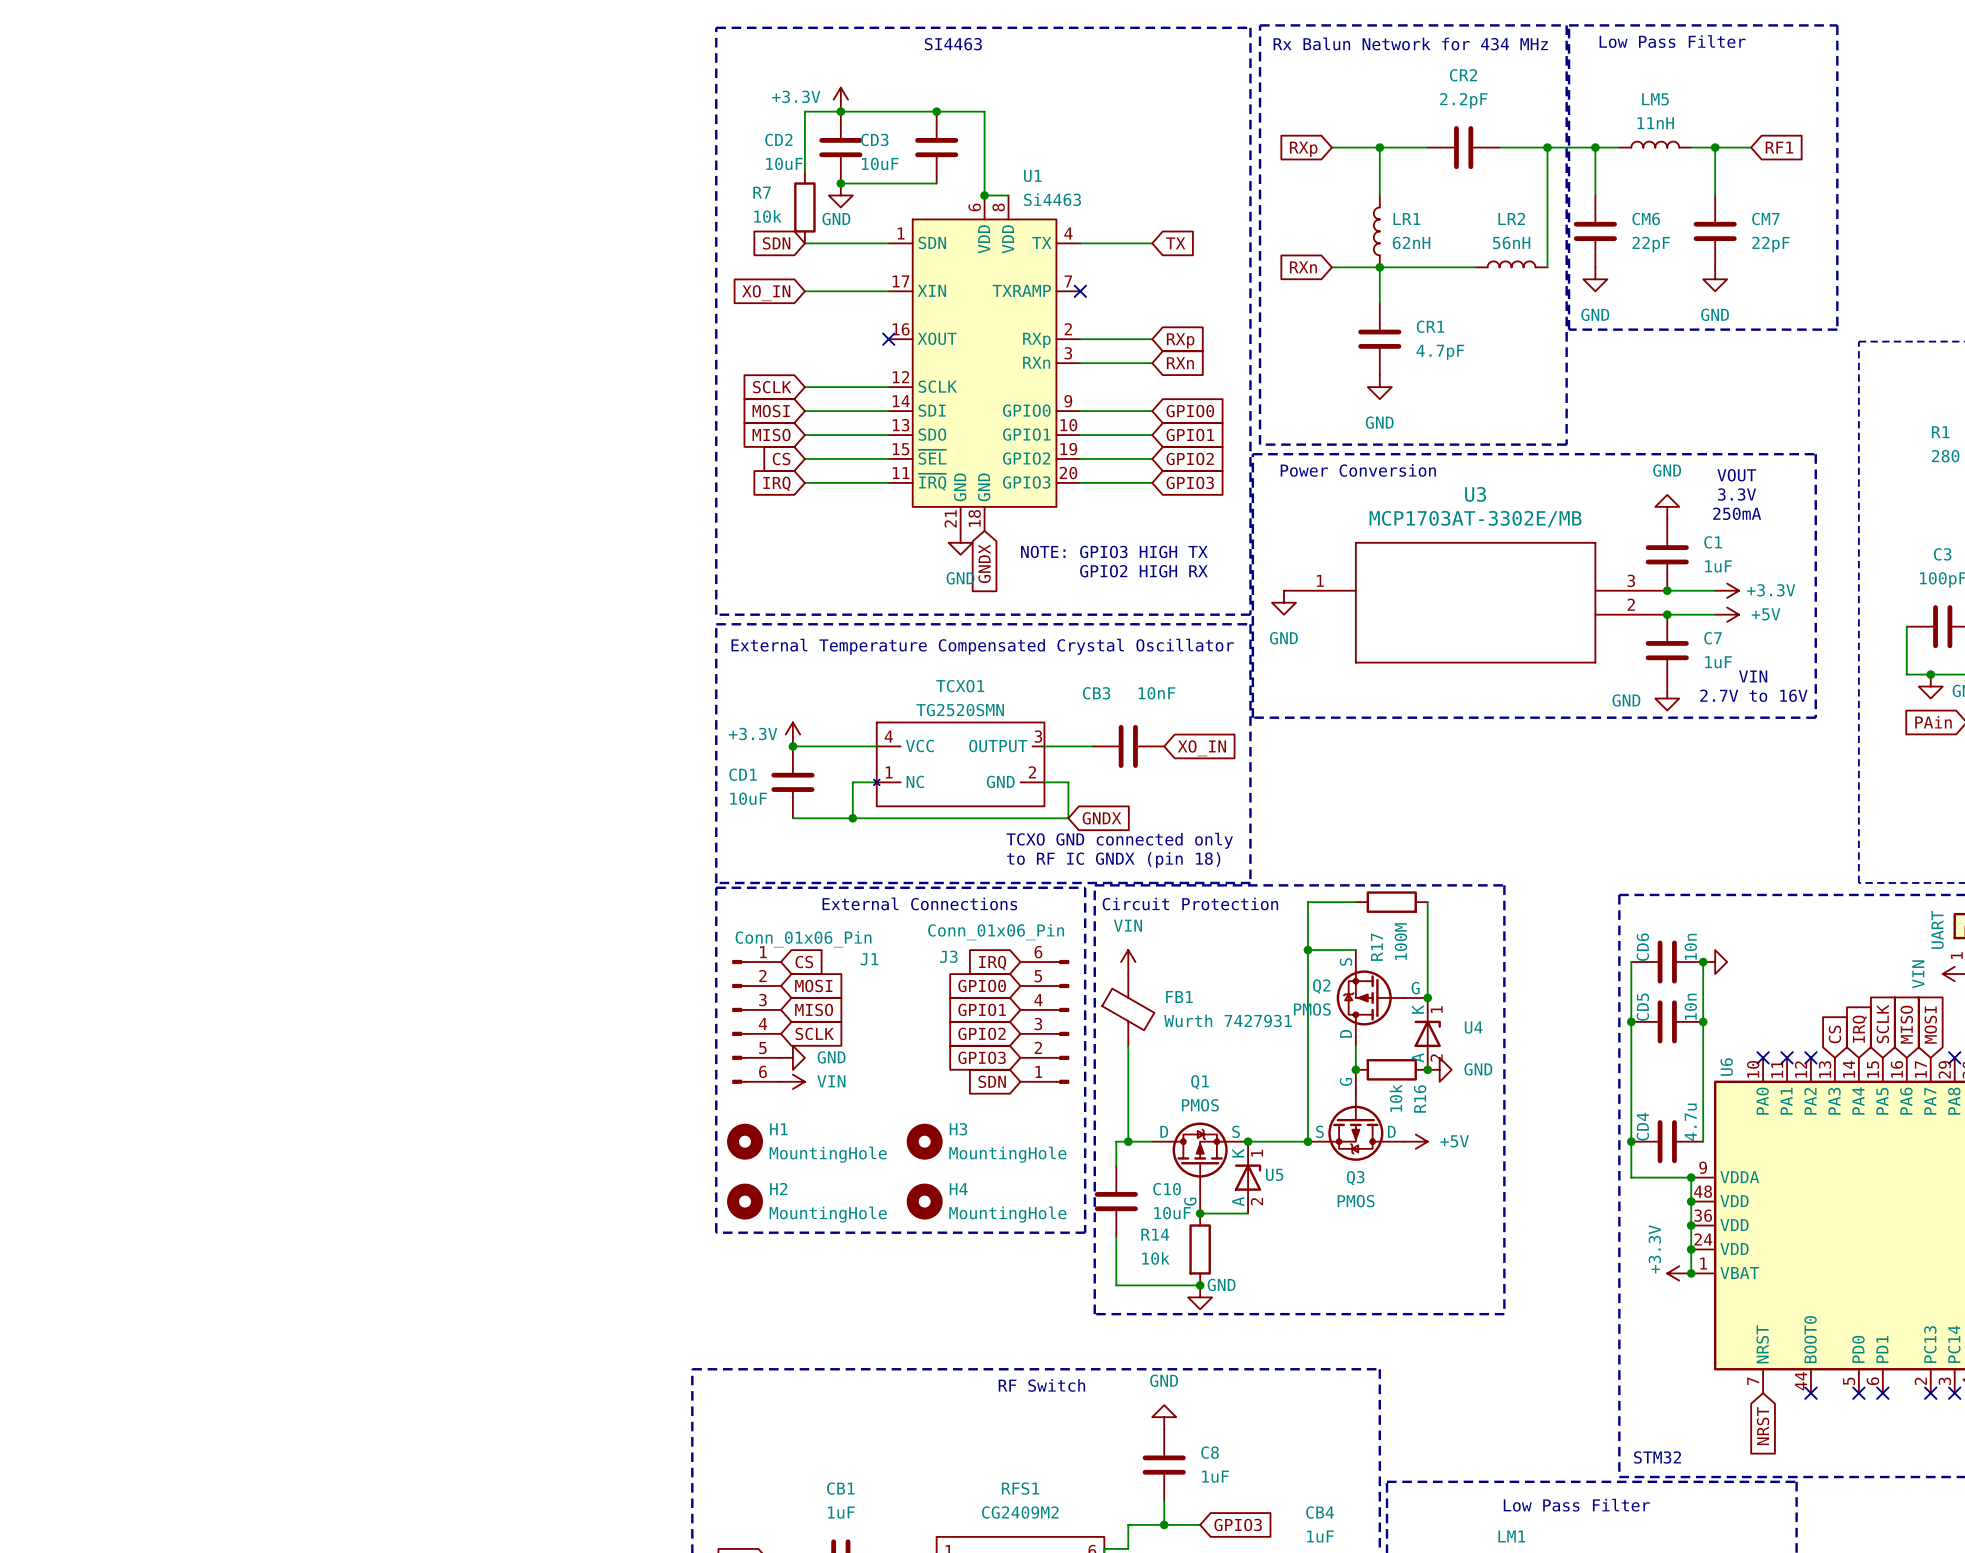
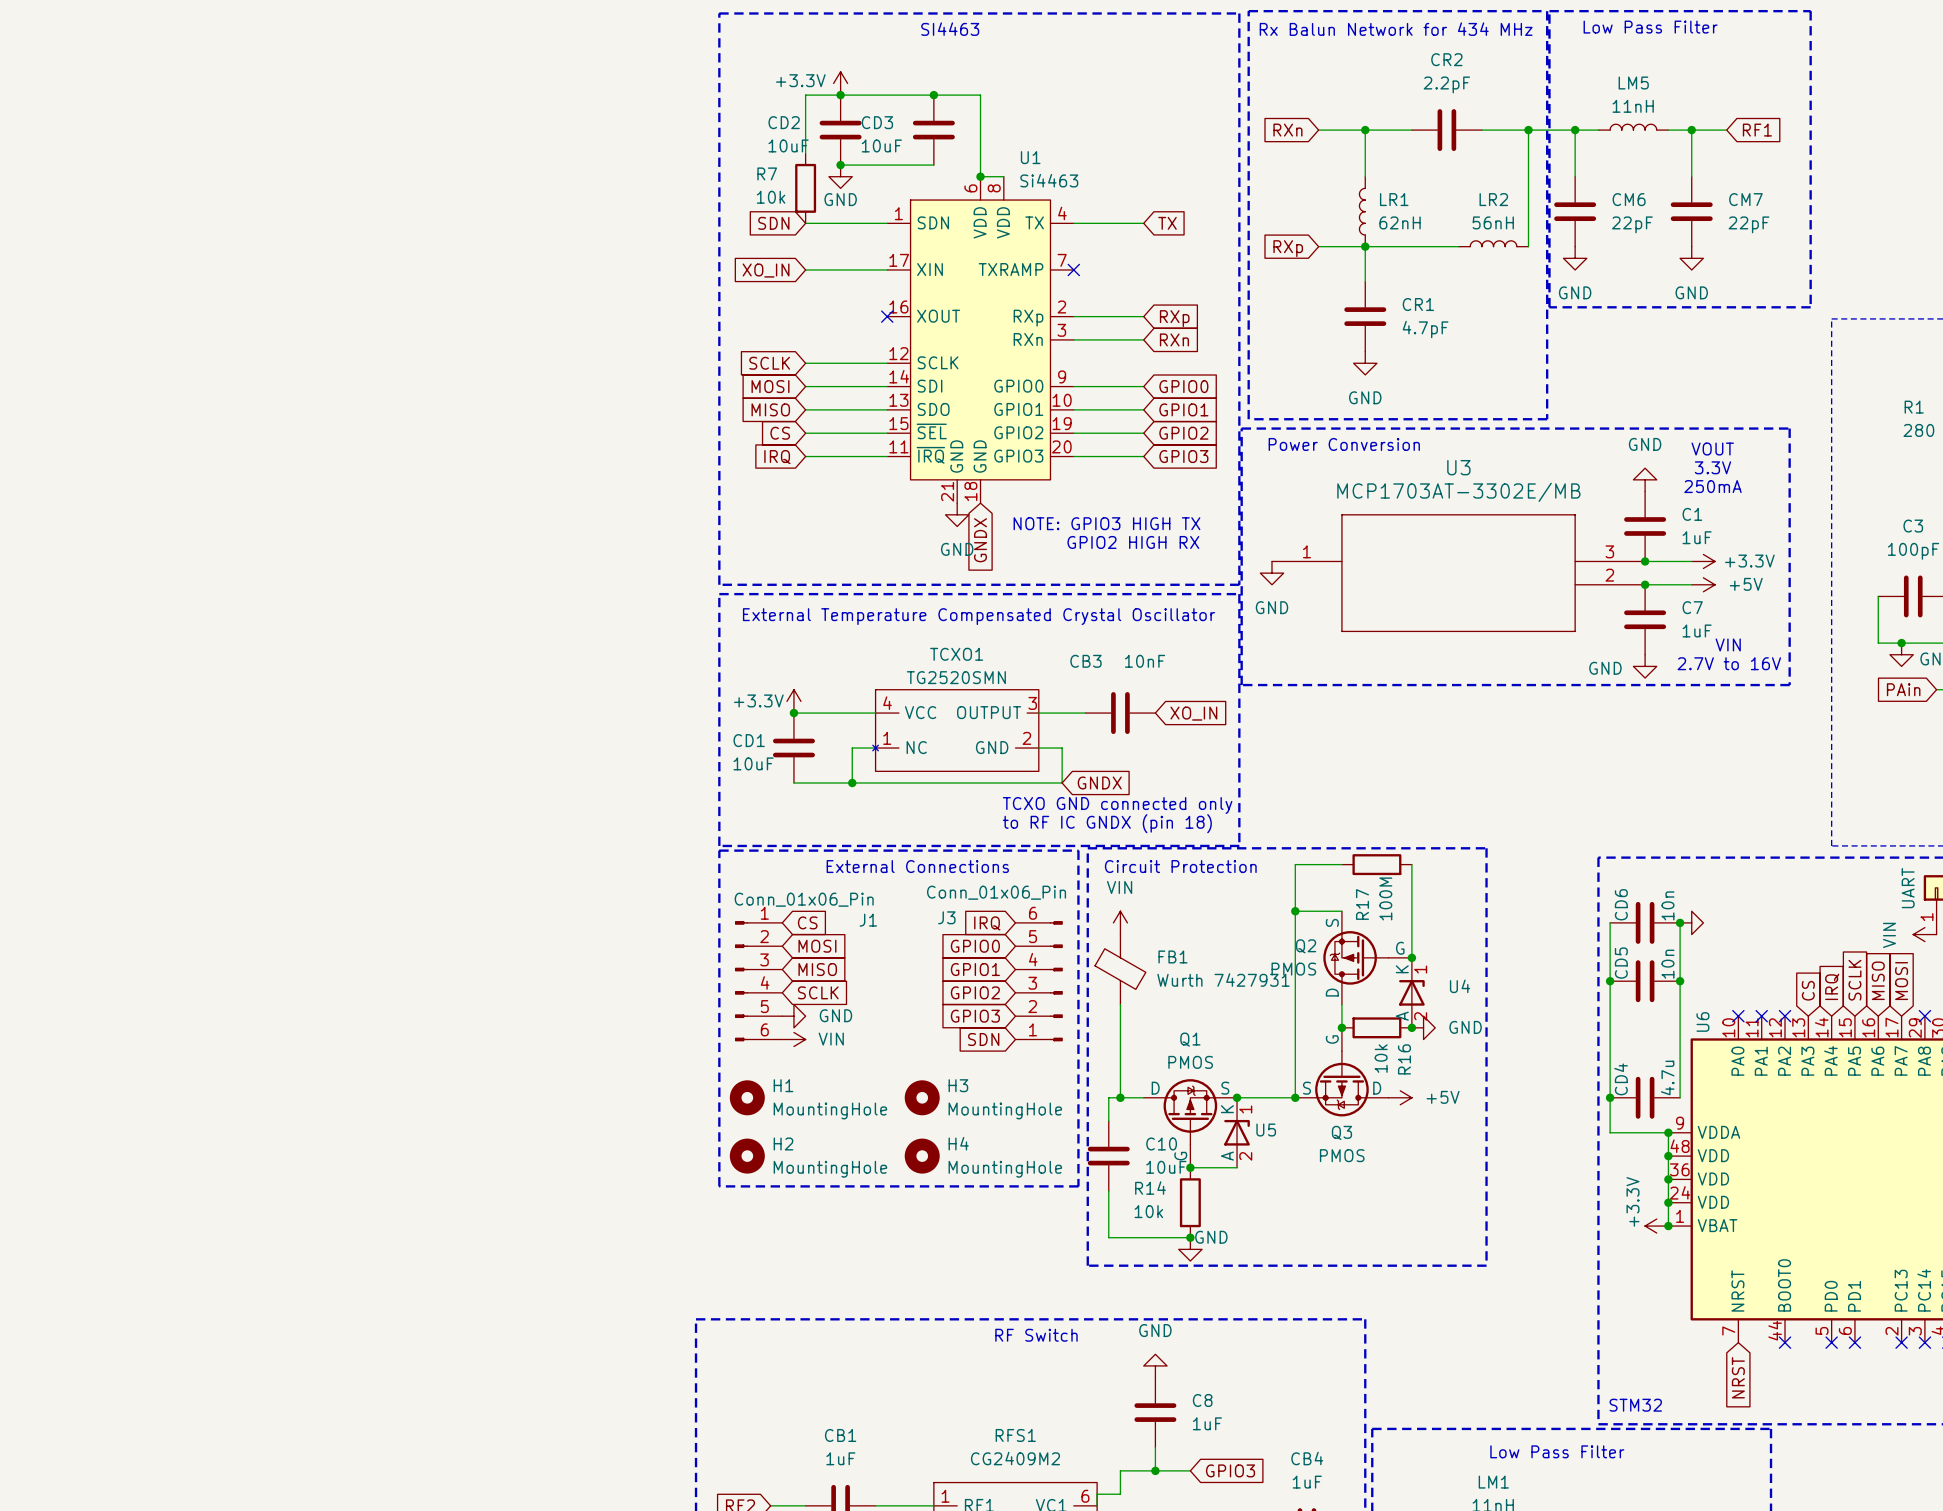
global label: RXp (1303, 149) -> RXn (1287, 130)
global label: RXn (1303, 267) -> RXp (1288, 248)

